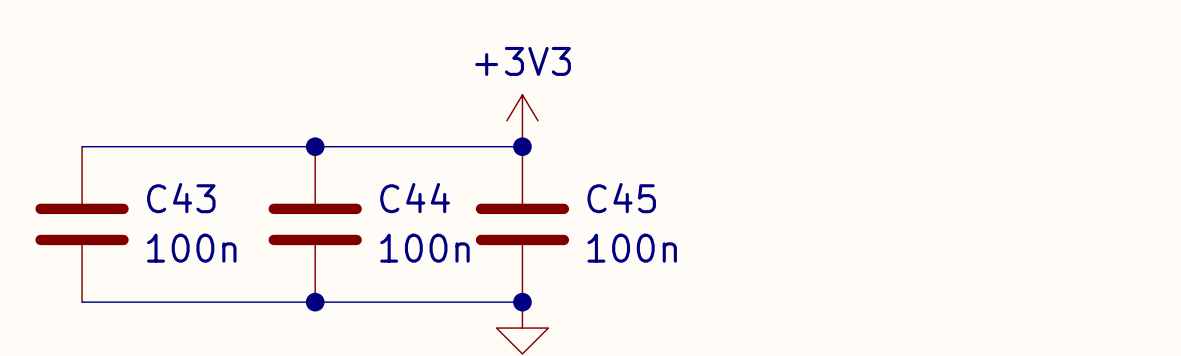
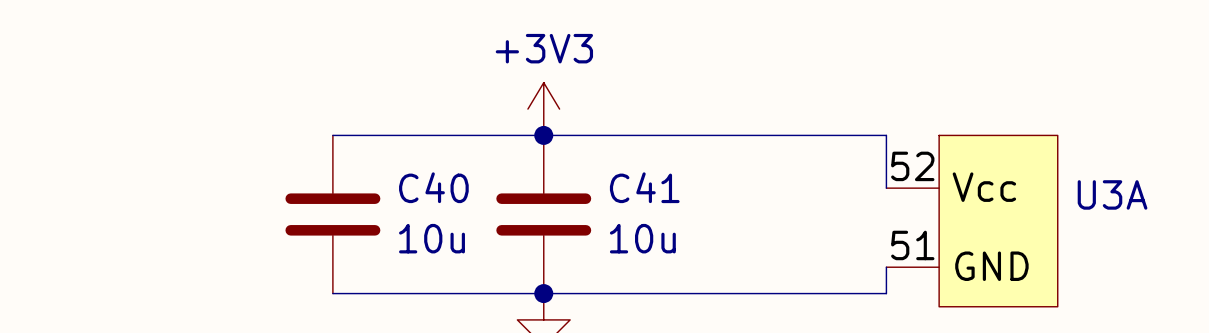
wire: (82, 146) (315, 146) -> none
junction: (315, 146) -> none
wire: none -> (543, 135) (886, 135) (886, 188)
C44 name: C44 (415, 198) -> C40 (433, 187)
C45 name: C45 (621, 198) -> C41 (644, 187)
C43: 100n (82, 224) -> none
U3A: none -> (972, 221)
C44 value: 100n (424, 248) -> 10u (432, 238)
C45 value: 100n (632, 248) -> 10u (642, 238)
wire: none -> (886, 267) (886, 293) (543, 293)
wire: (82, 302) (315, 302) -> none
junction: (315, 302) -> none

